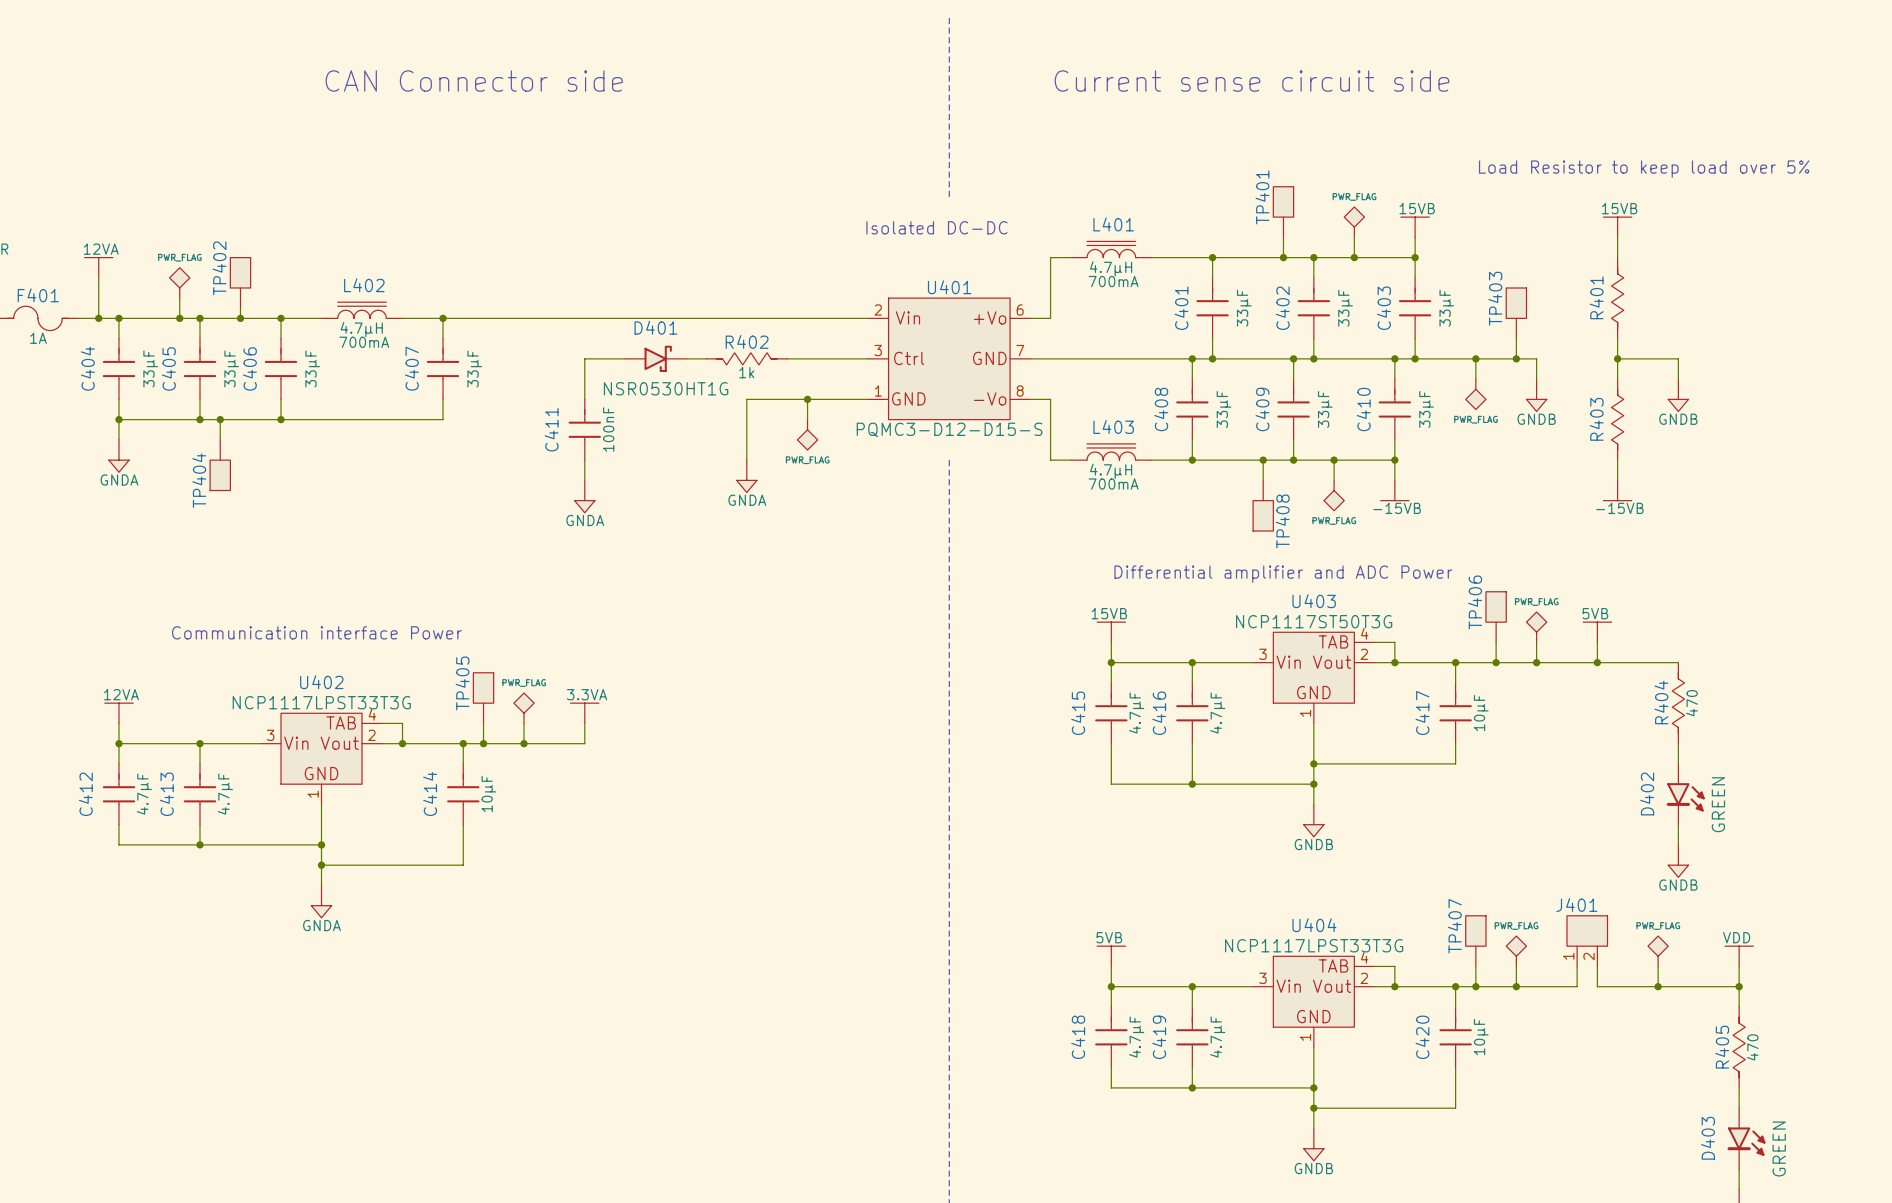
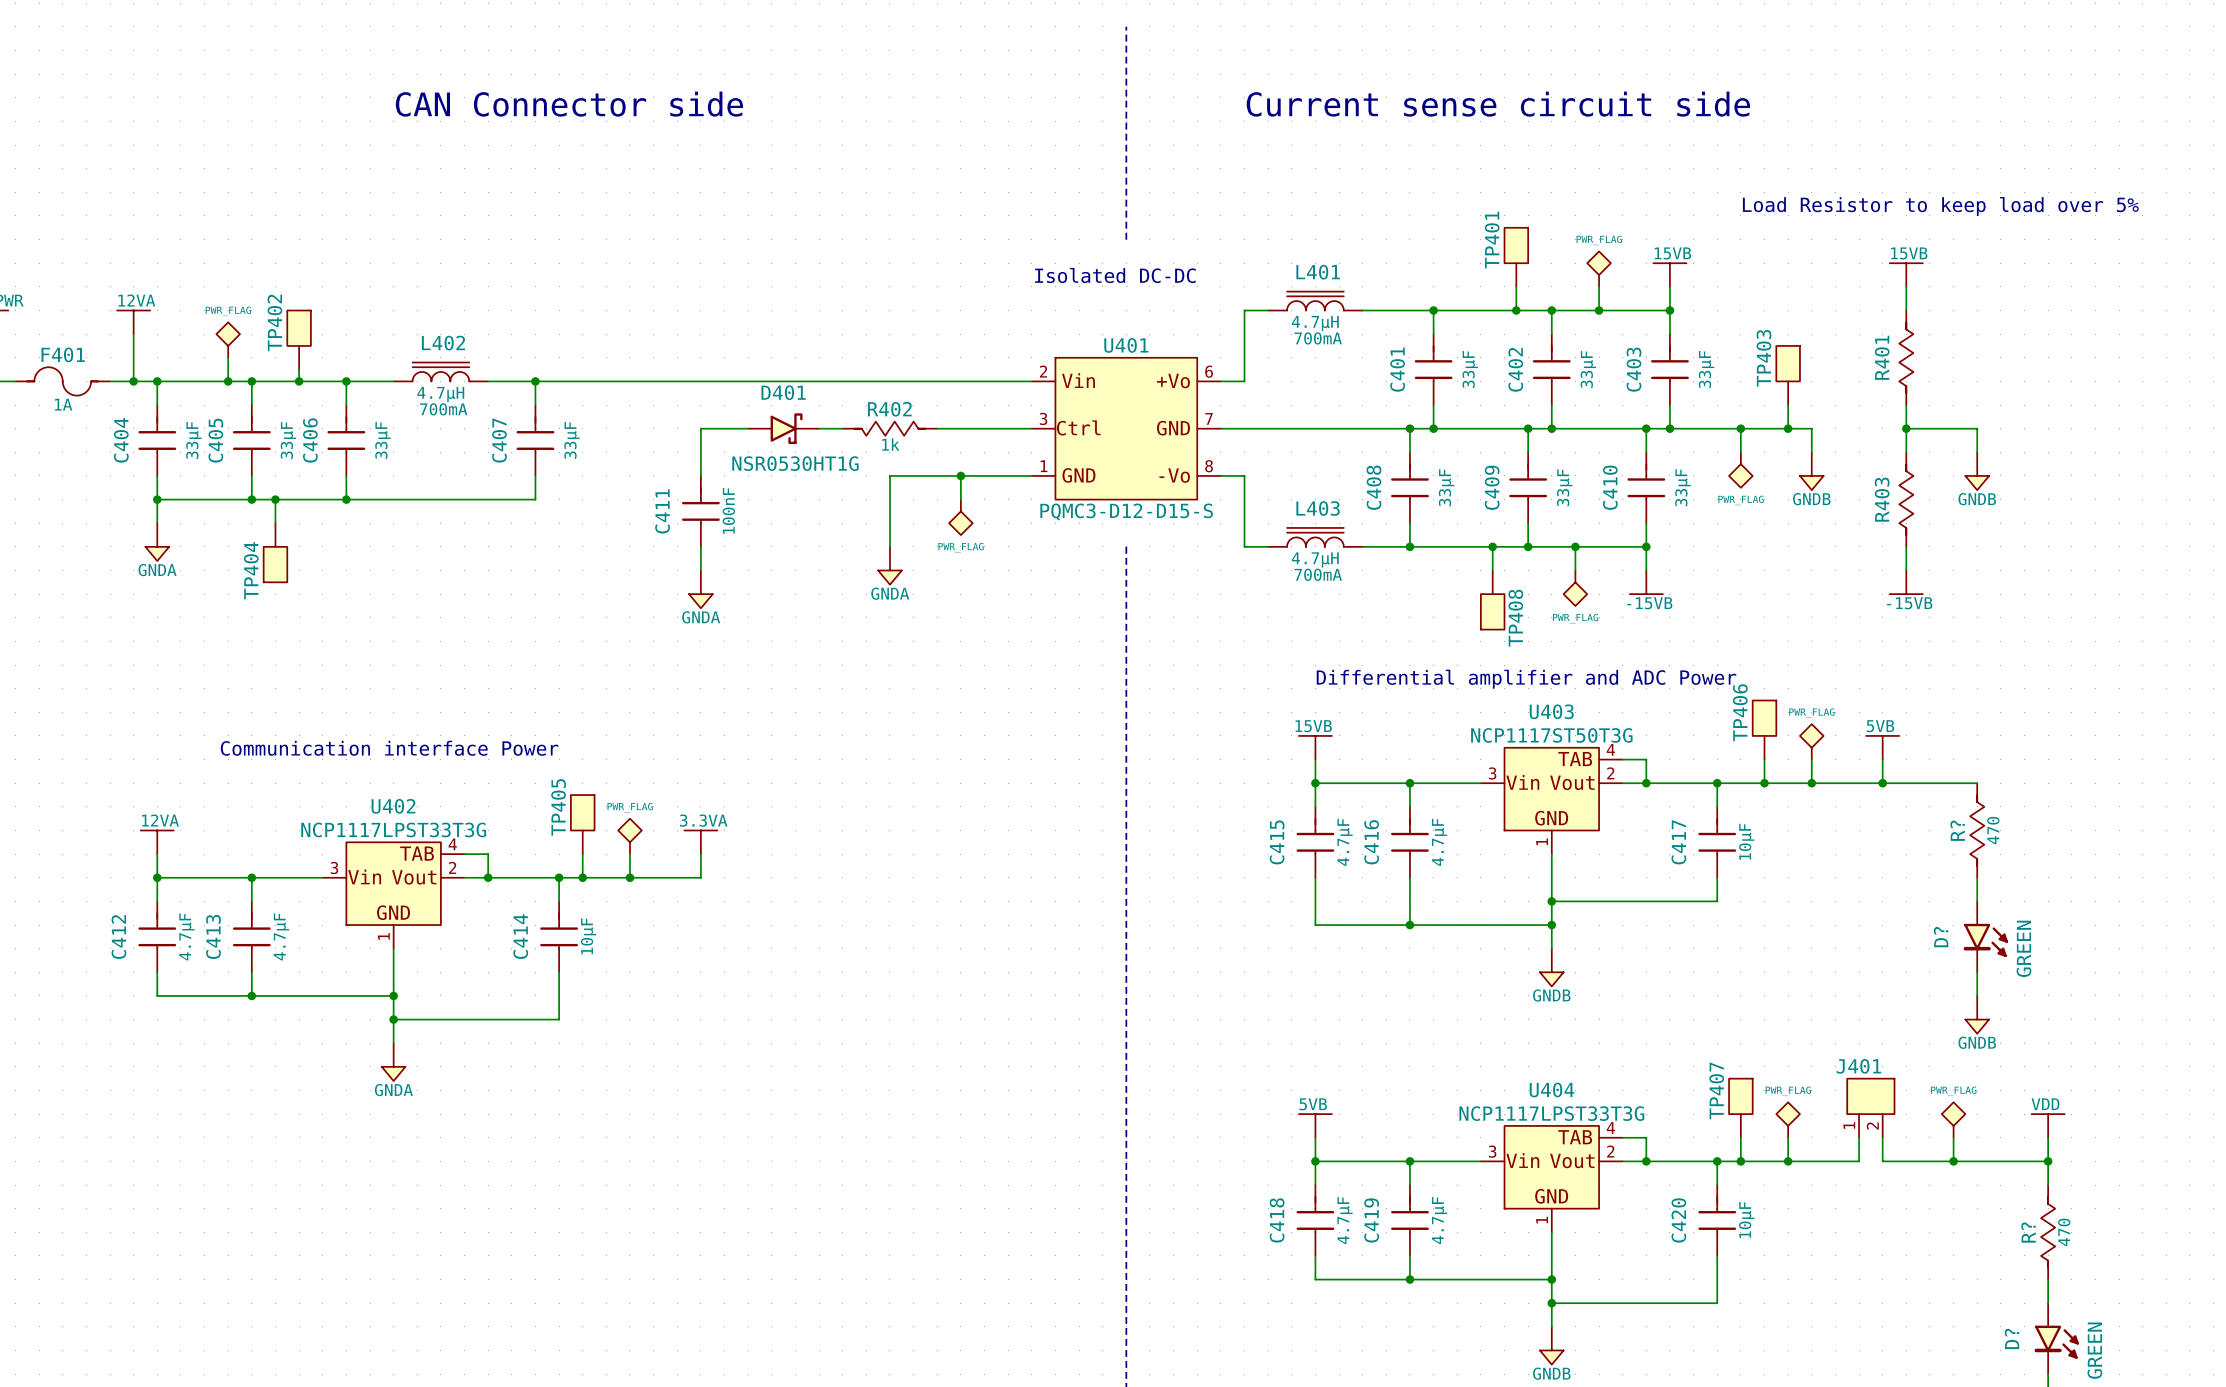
R404 name: R404 (1661, 702) -> R? (1957, 830)
D402 name: D402 (1647, 794) -> D? (1941, 937)
R405 name: R405 (1722, 1047) -> R? (2028, 1232)
D403 name: D403 (1708, 1138) -> D? (2012, 1338)

